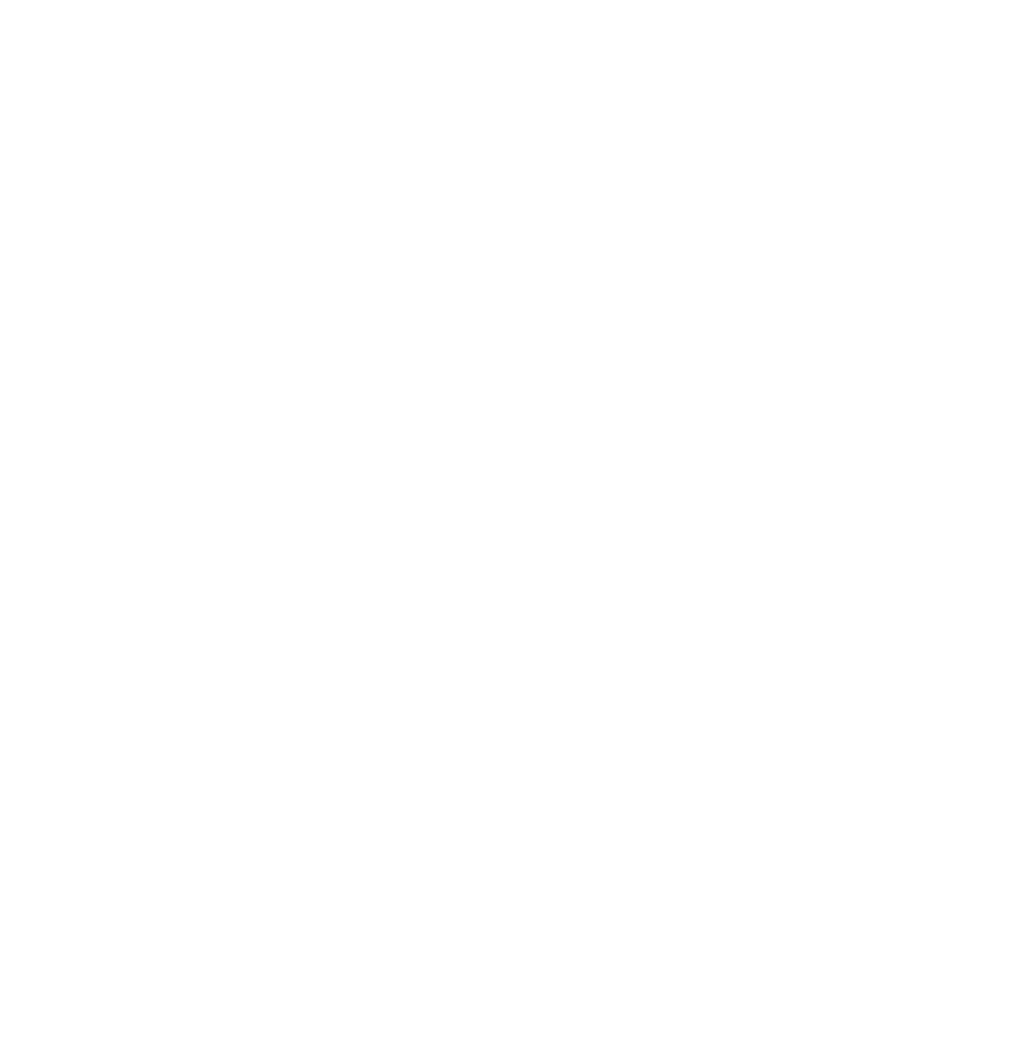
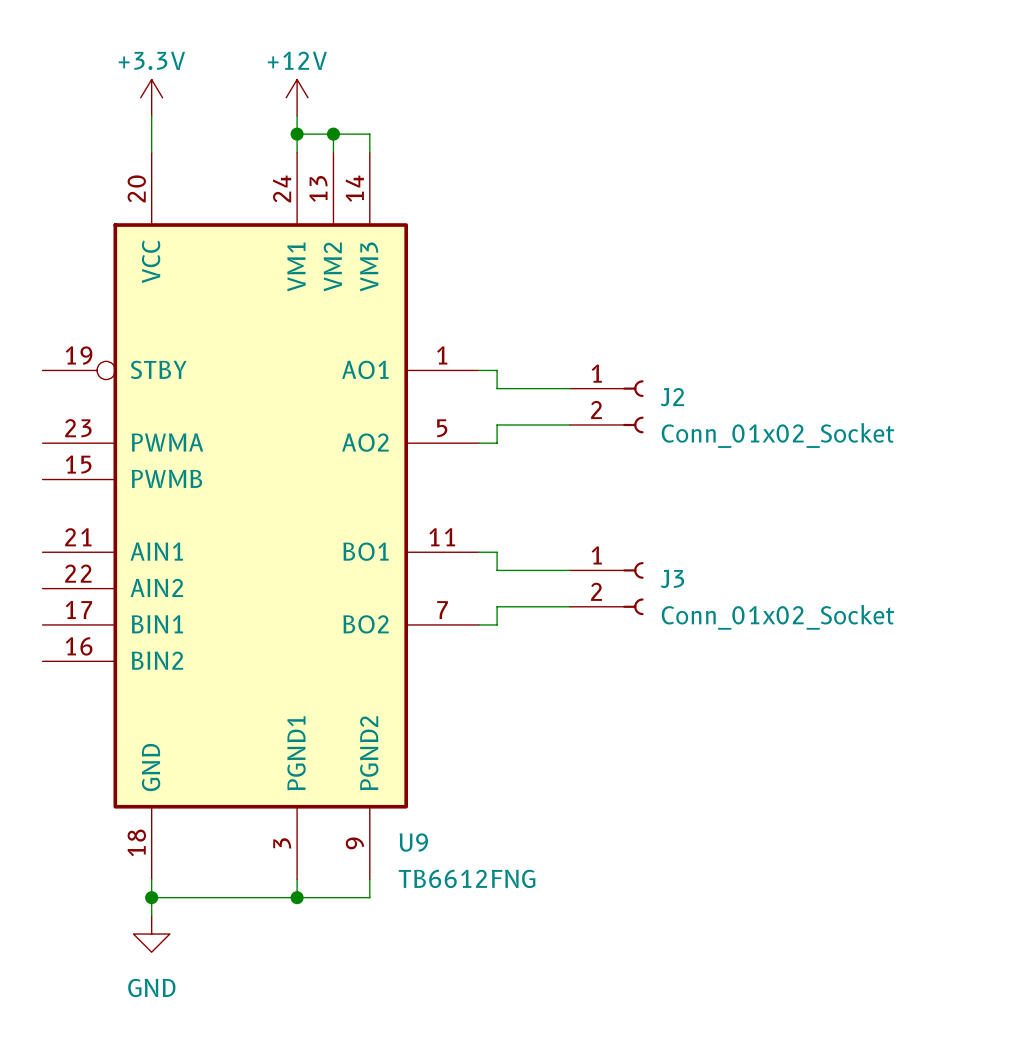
power symbol: none -> +3.3V (151, 97)
power symbol: none -> +12V (297, 97)
wire: none -> (151, 115) (151, 152)
wire: none -> (297, 115) (297, 152)
wire: none -> (297, 134) (369, 134) (369, 152)
junction: none -> (297, 134)
wire: none -> (333, 134) (333, 152)
junction: none -> (333, 134)
wire: none -> (478, 370) (497, 370) (497, 388) (569, 388)
J2: none -> Conn_01x02_Socket (606, 406)
wire: none -> (569, 424) (497, 424) (497, 443) (478, 443)
U9: none -> TB6612FNG (260, 515)
wire: none -> (478, 552) (497, 552) (497, 570) (569, 570)
J3: none -> Conn_01x02_Socket (606, 588)
wire: none -> (569, 606) (497, 606) (497, 624) (478, 624)
wire: none -> (151, 879) (151, 915)
wire: none -> (297, 879) (297, 897)
wire: none -> (369, 879) (369, 897) (151, 897)
junction: none -> (151, 897)
junction: none -> (297, 897)
power symbol: none -> GND (151, 934)

